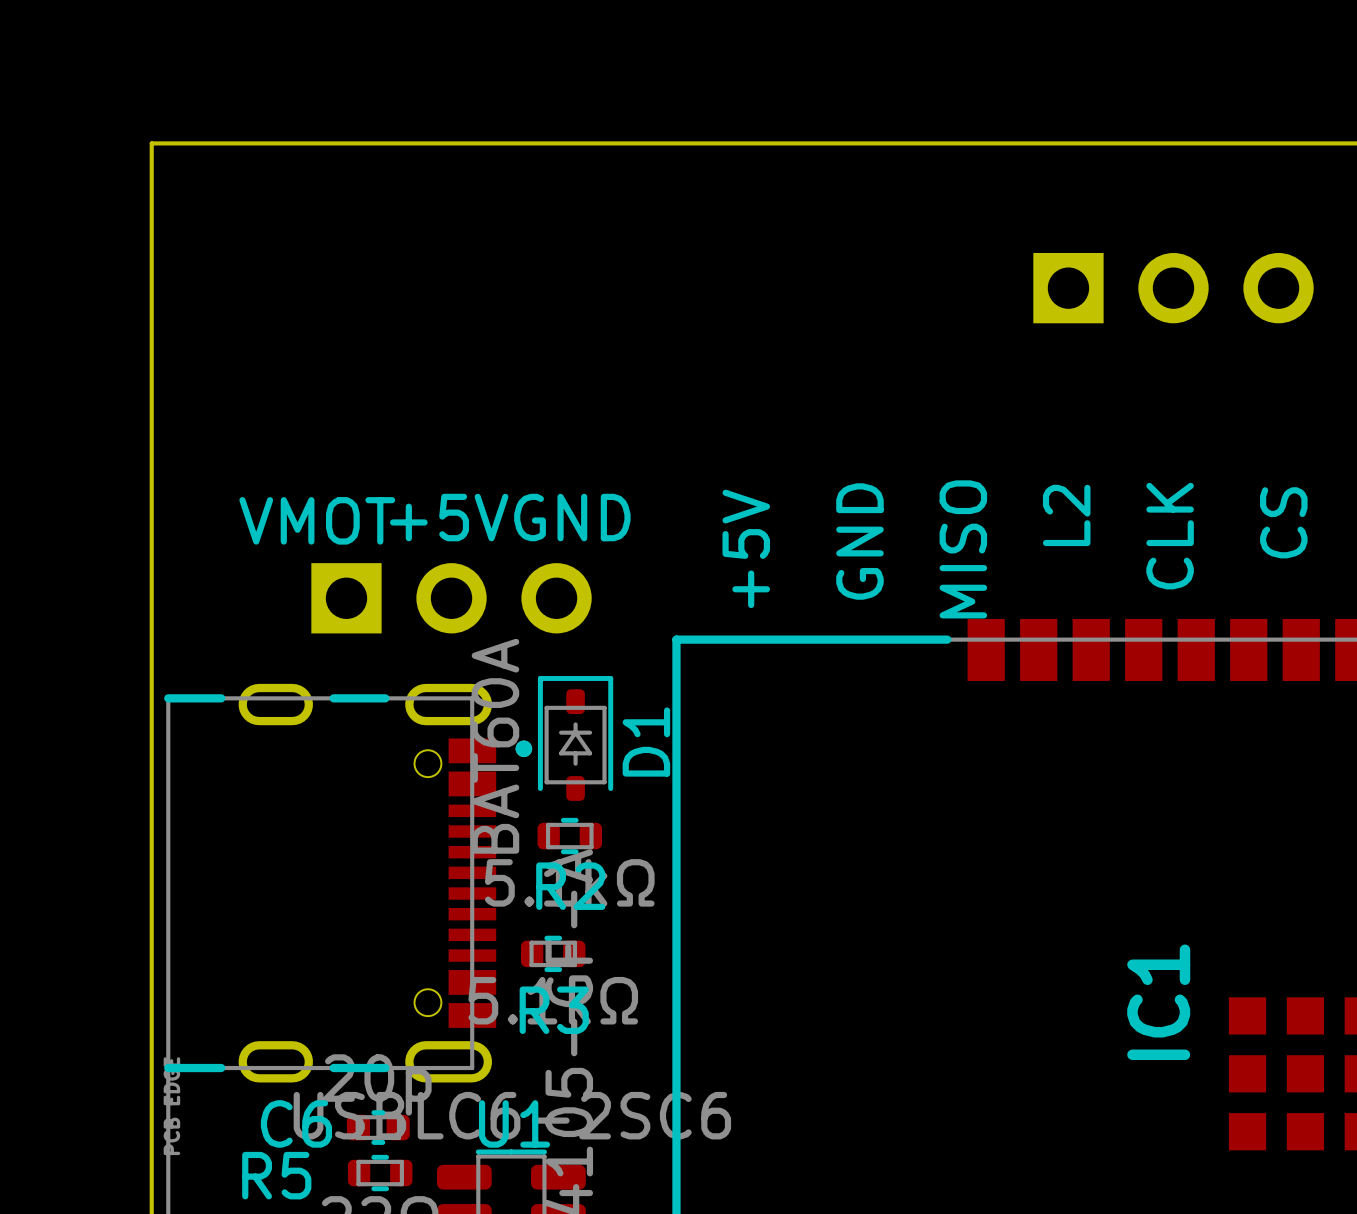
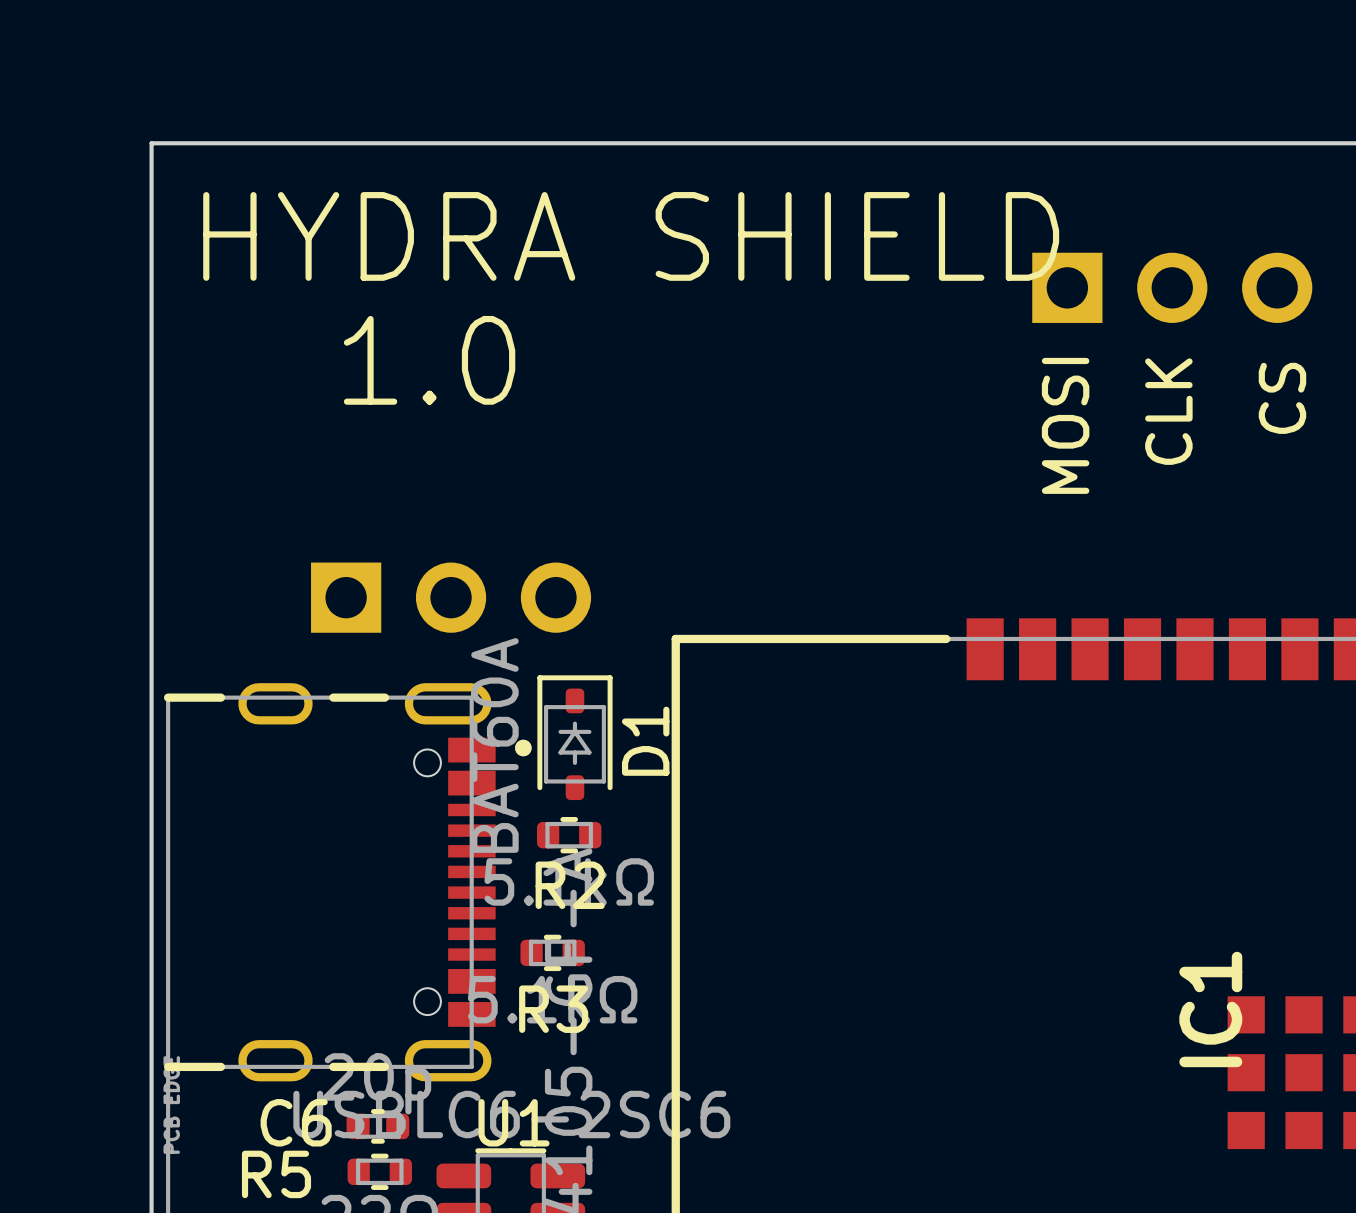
text: none -> HYDRA SHIELD (631, 236)
text: none -> 1.0 (429, 360)
text: none -> MOSI (1065, 425)
text: L2 (1066, 515) -> none
text: +5V (449, 517) -> none
text: GND (572, 517) -> none
text: VMOT (317, 520) -> none
text position: CS (1283, 522) -> CS (1282, 398)
text position: CLK (1170, 536) -> CLK (1168, 411)
text: GND (859, 541) -> none
text: +5V (746, 548) -> none
text: MISO (963, 549) -> none
IC1 name position: IC1 (1158, 1002) -> IC1 (1210, 1009)

